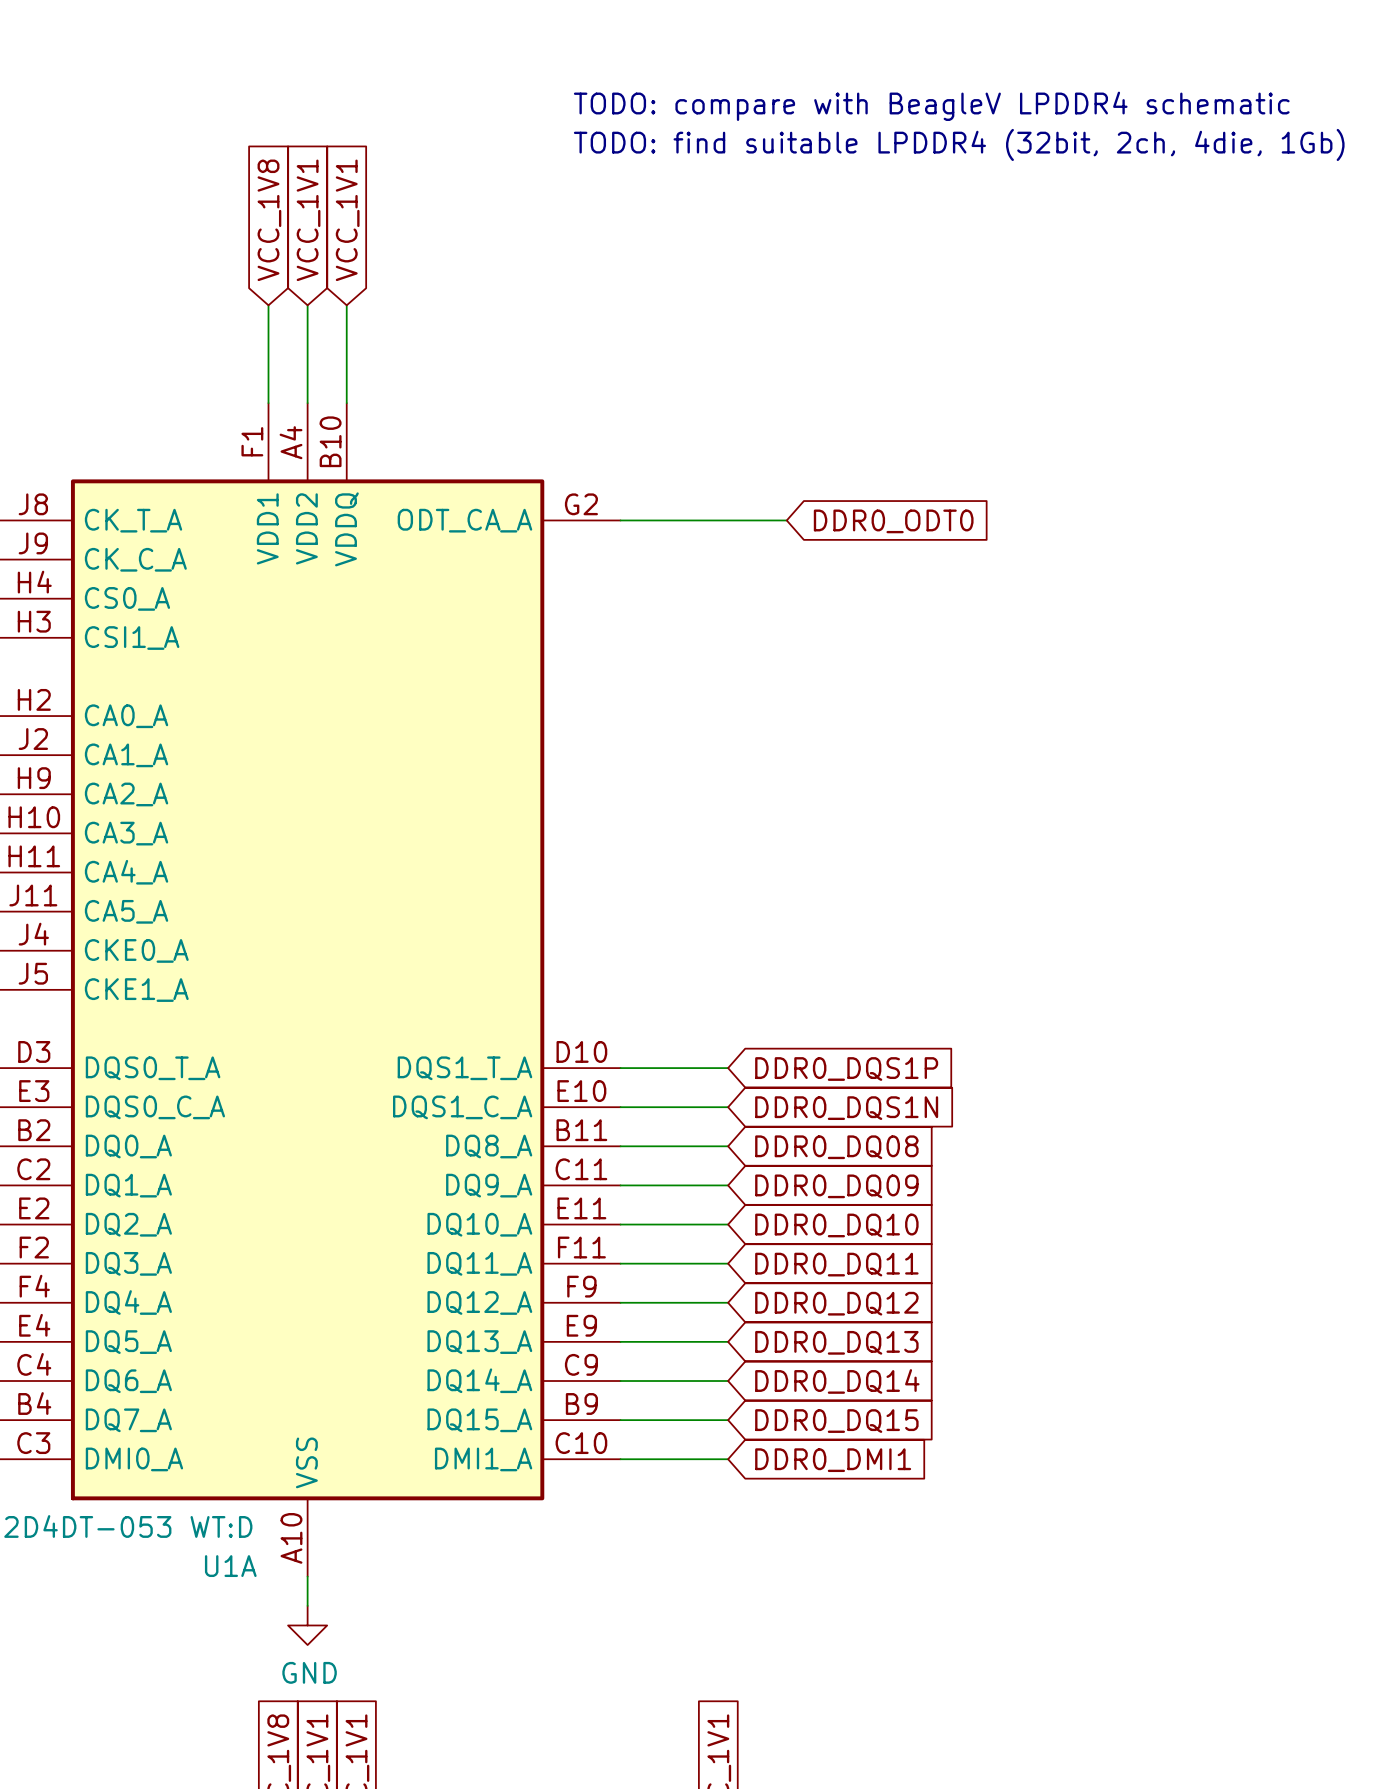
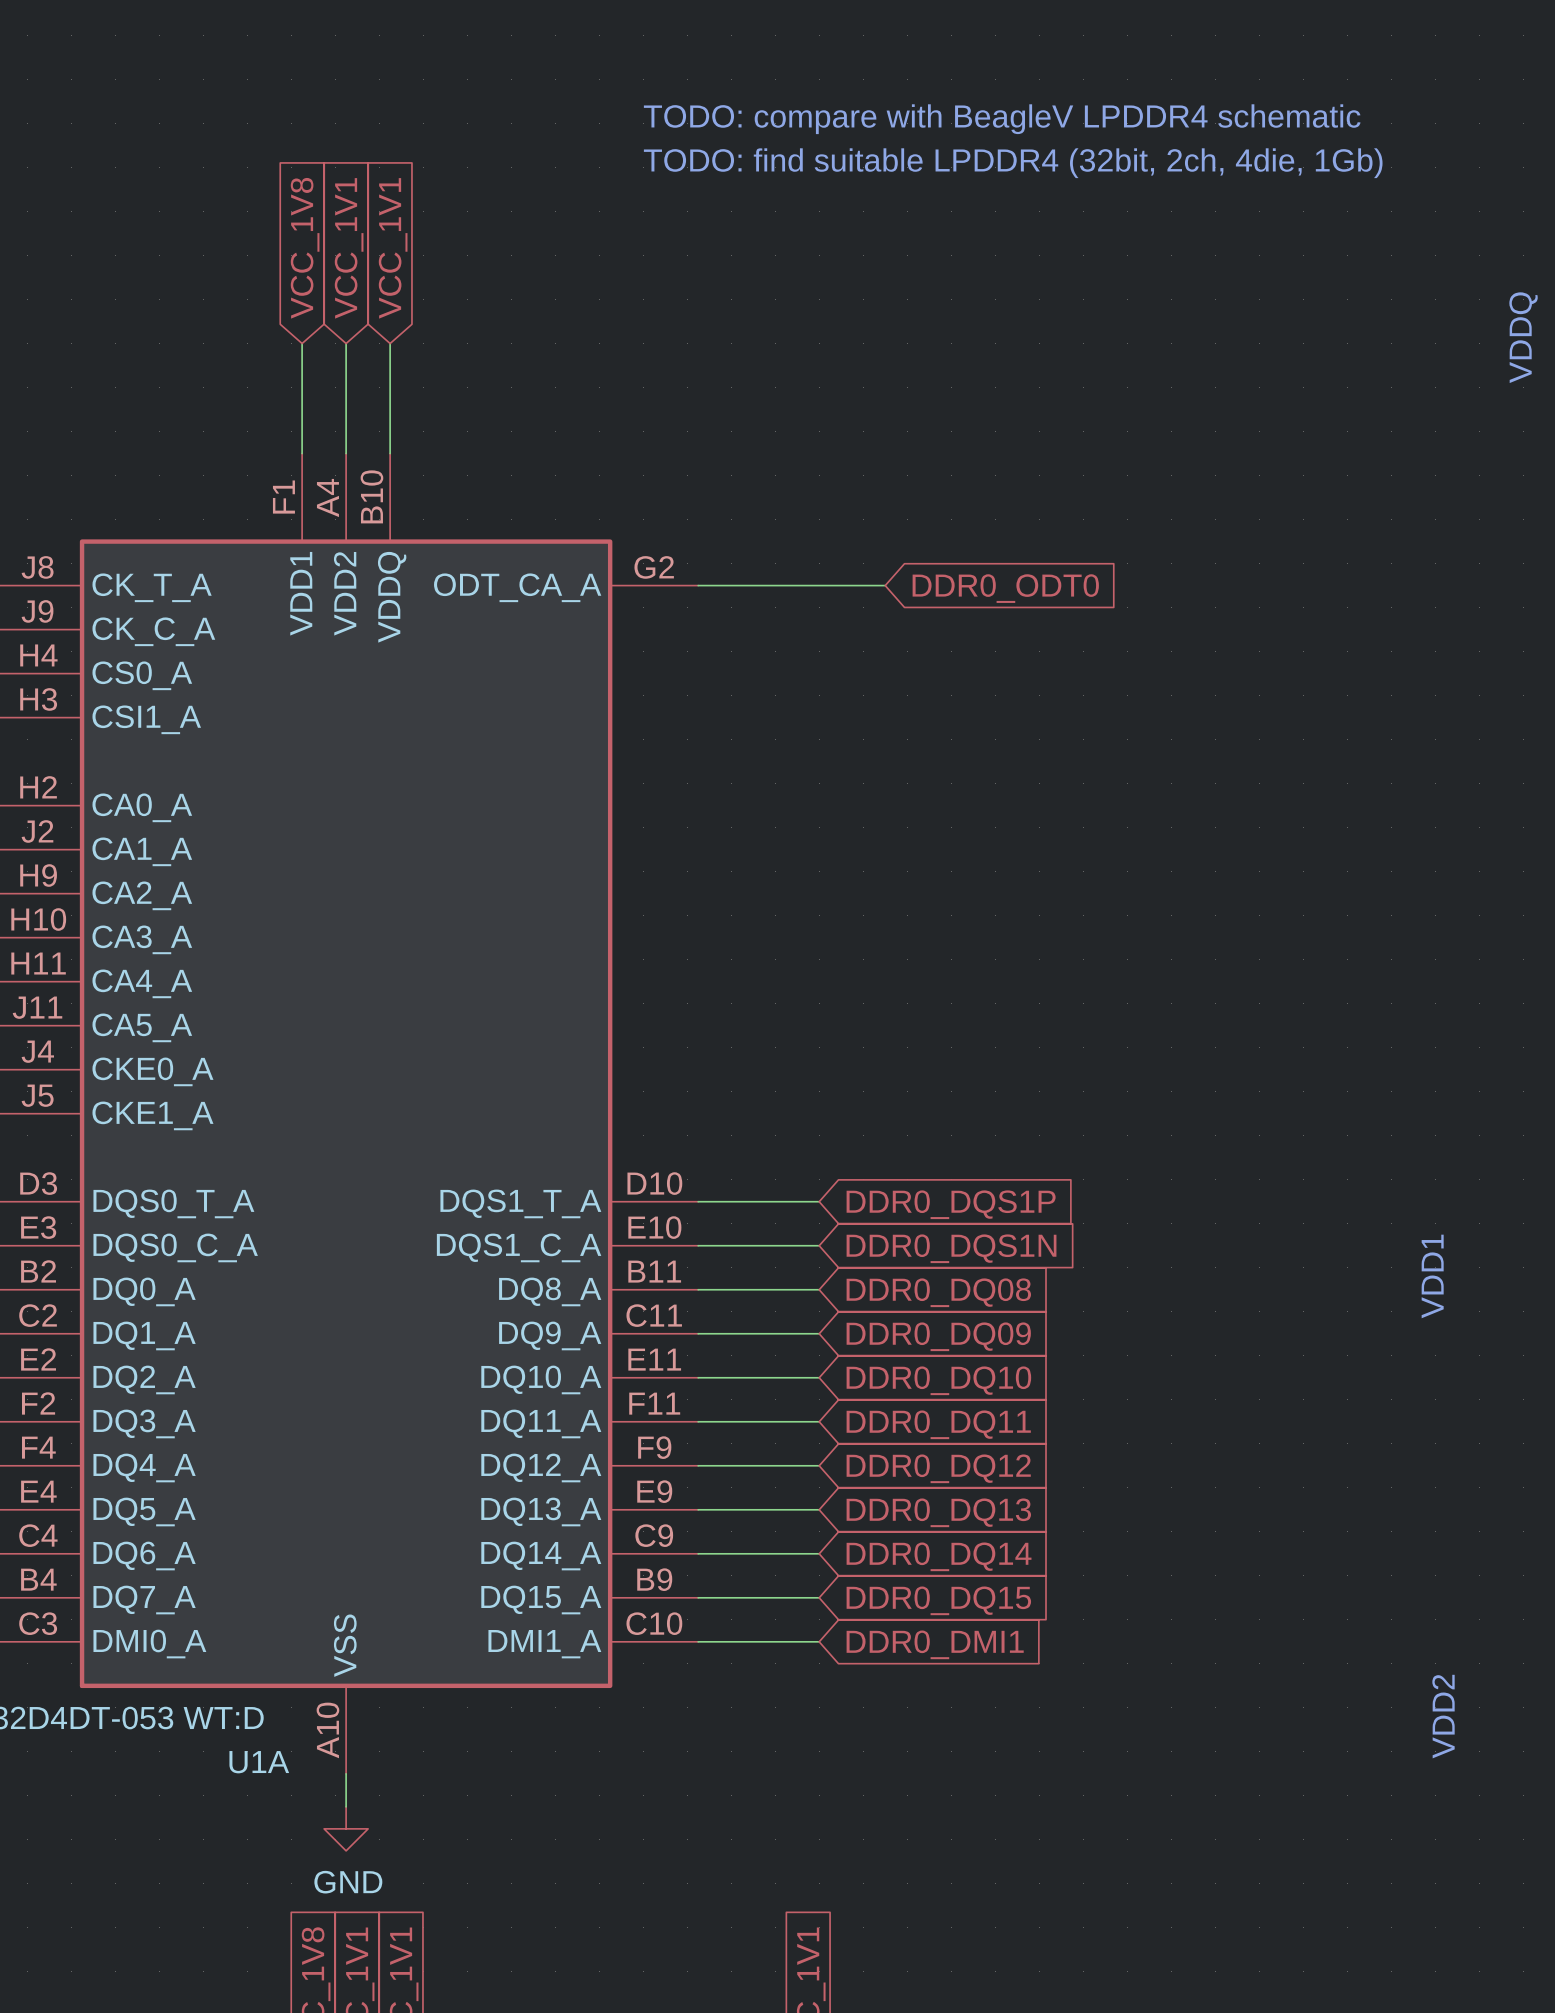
text: none -> VDDQ (1523, 337)
text: none -> VDD1 (1432, 1276)
text: none -> VDD2 (1443, 1716)

